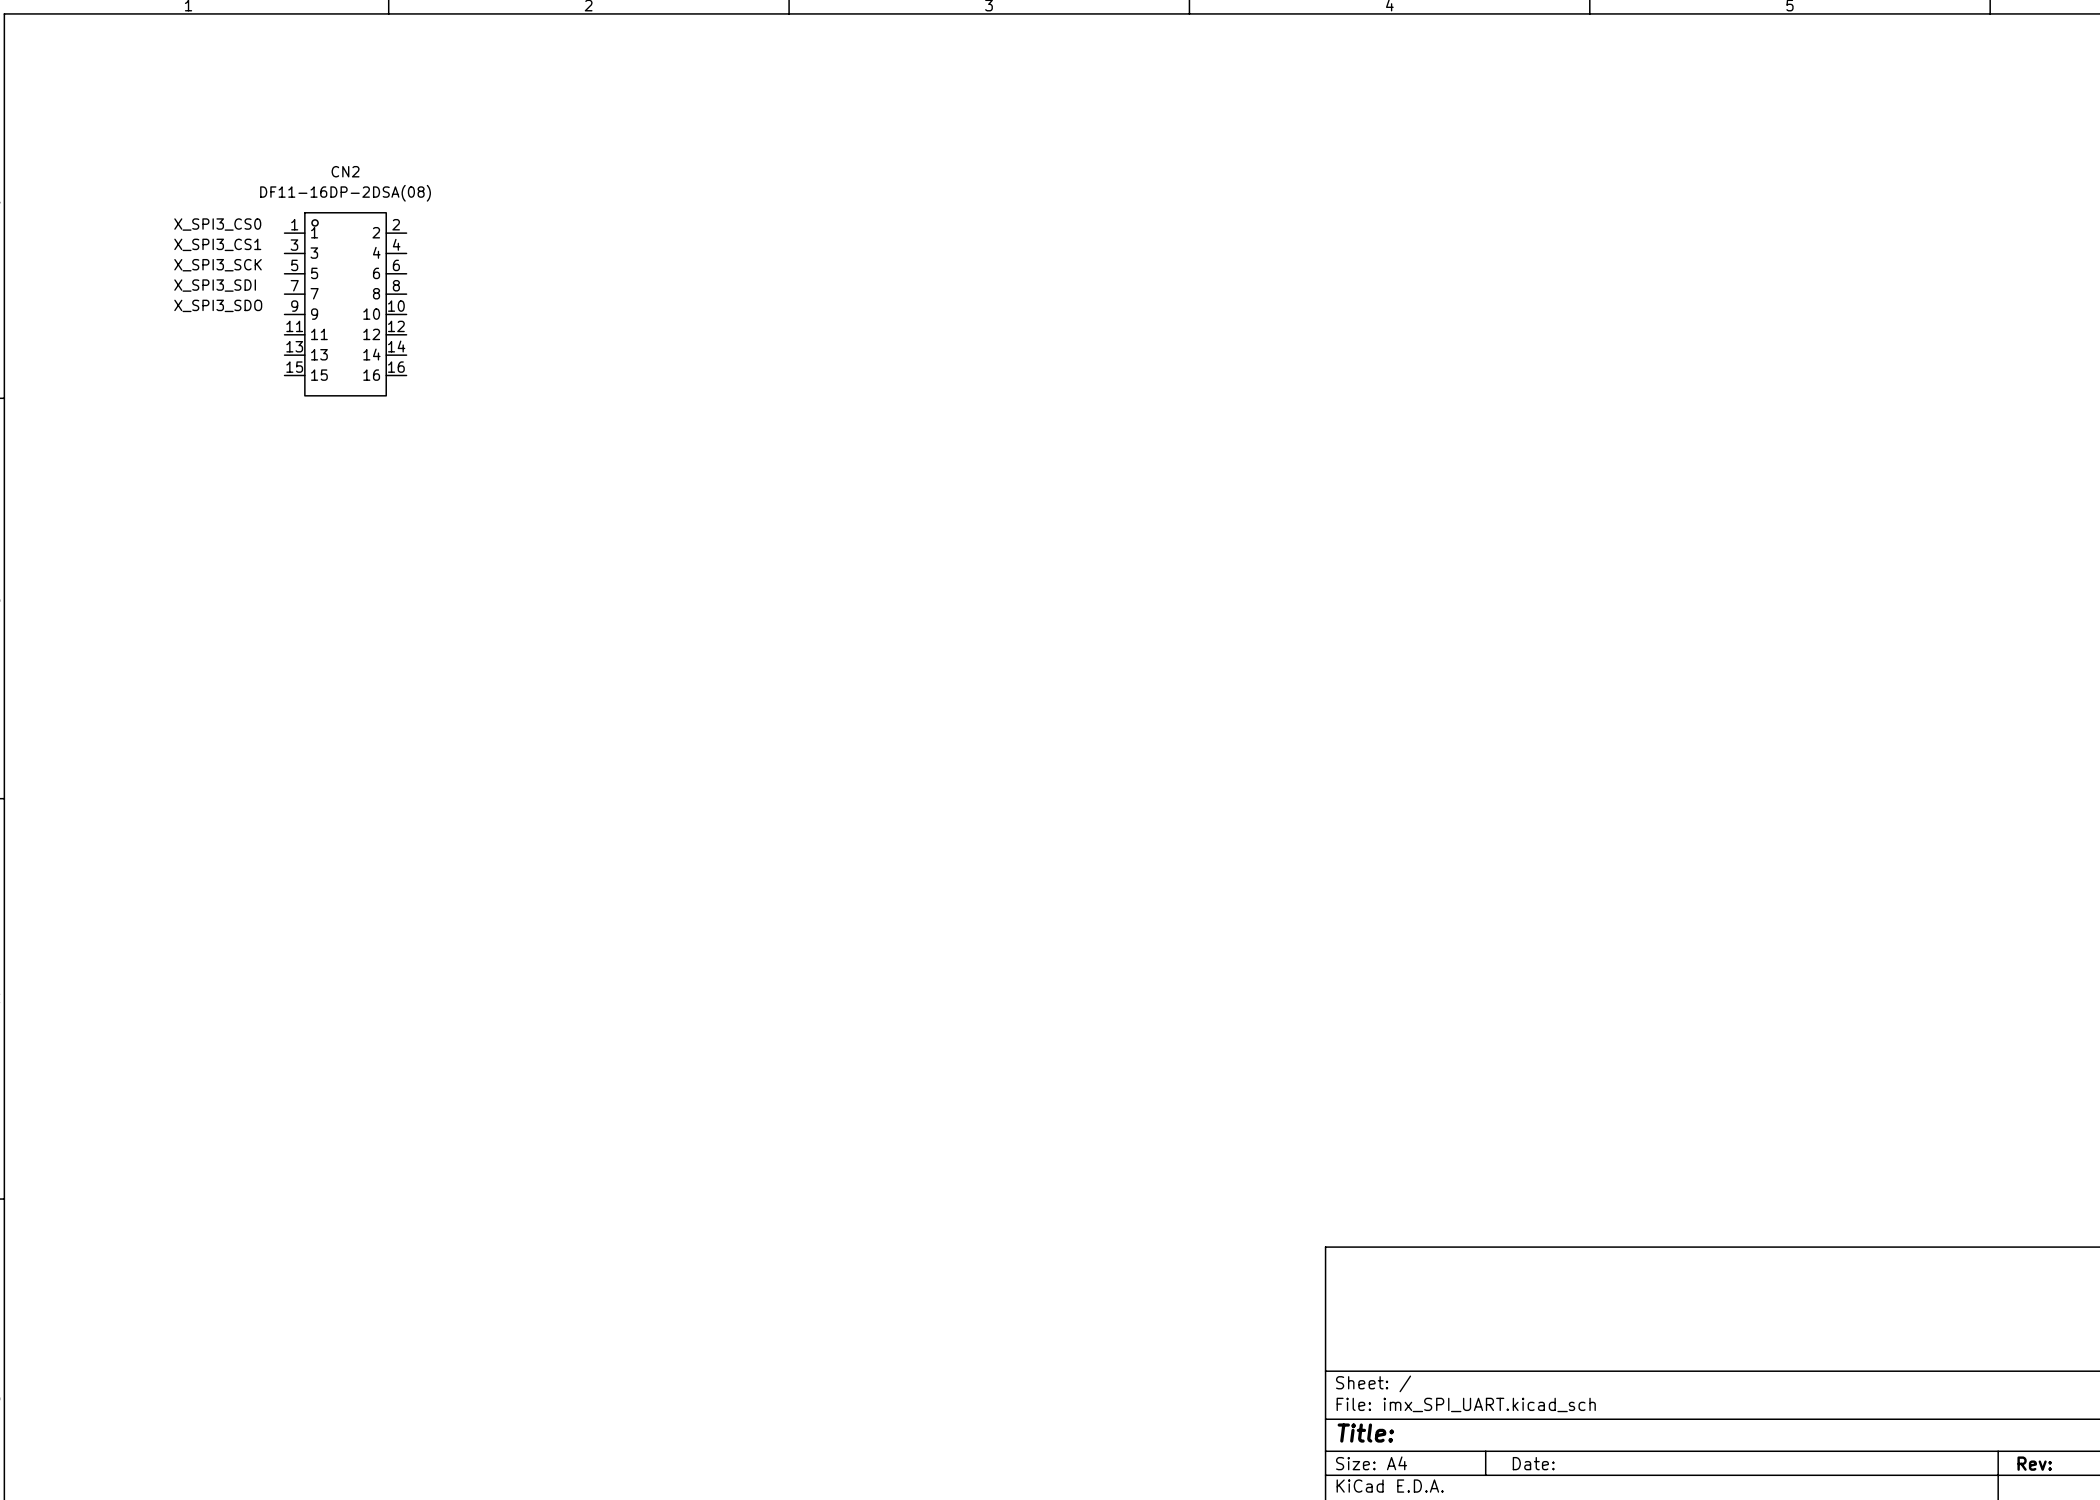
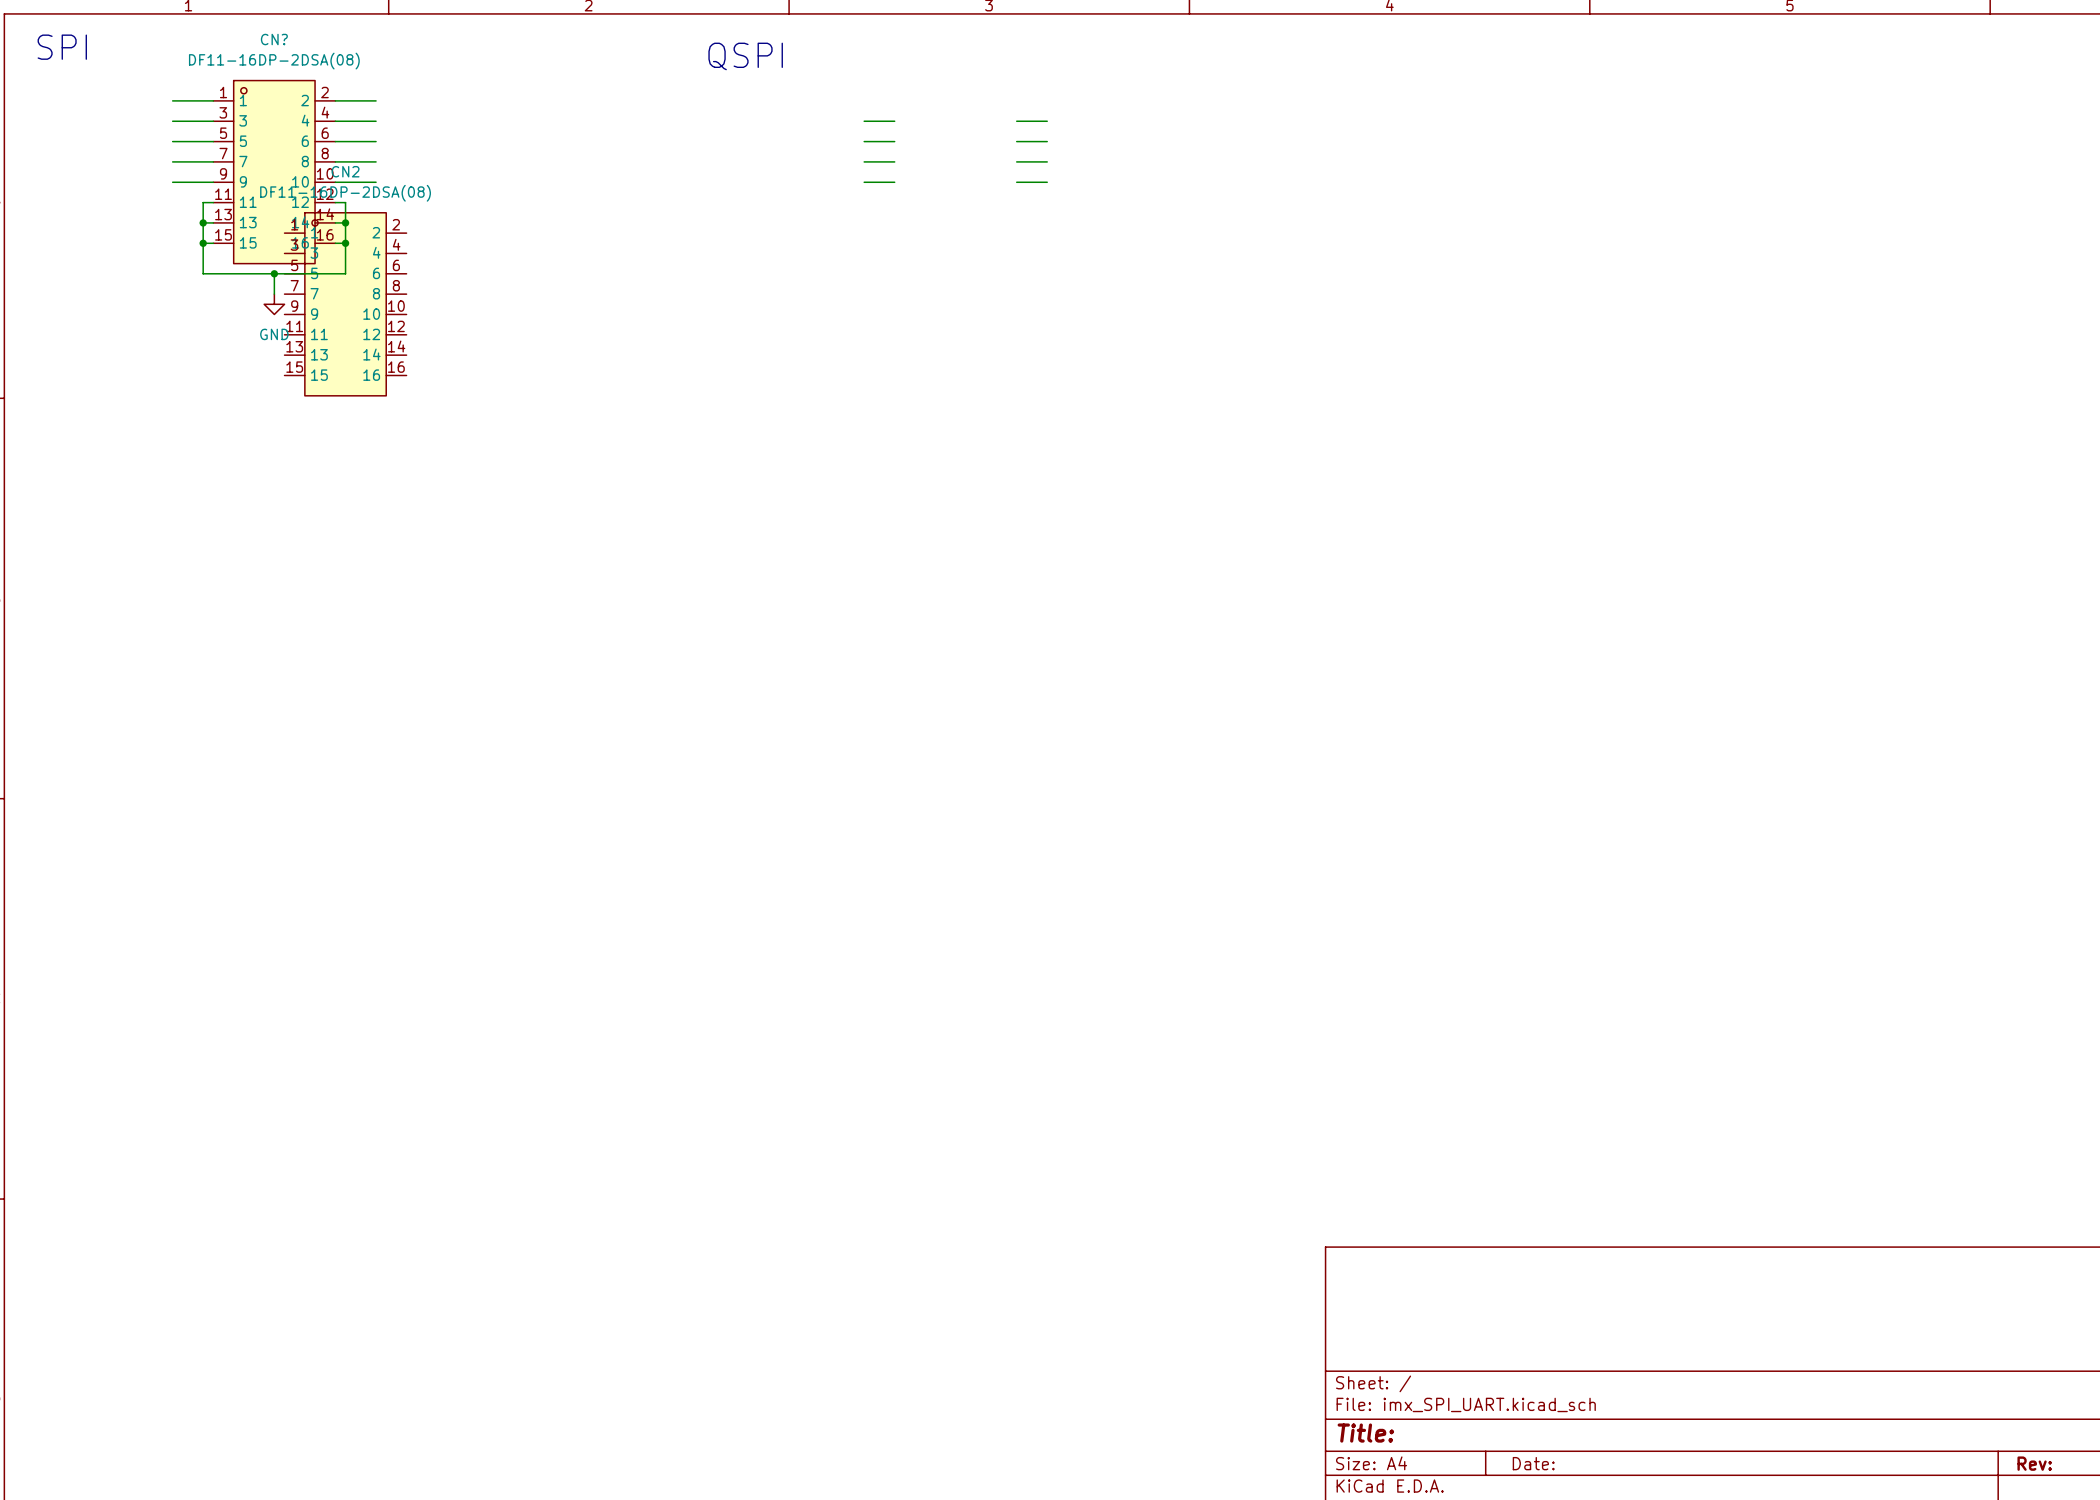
text: none -> SPI (62, 47)
text: none -> QSPI (745, 56)
wire: none -> (172, 100) (213, 100)
wire: none -> (335, 100) (376, 100)
wire: none -> (172, 121) (213, 121)
wire: none -> (335, 121) (376, 121)
wire: none -> (864, 121) (894, 121)
wire: none -> (1016, 121) (1047, 121)
wire: none -> (172, 141) (213, 141)
wire: none -> (335, 141) (376, 141)
wire: none -> (864, 141) (894, 141)
wire: none -> (1016, 141) (1047, 141)
wire: none -> (172, 161) (213, 161)
wire: none -> (335, 161) (376, 161)
wire: none -> (864, 161) (894, 161)
wire: none -> (1016, 161) (1047, 161)
CN?: none -> DF11-16DP-2DSA(08) (274, 172)
wire: none -> (172, 182) (213, 182)
wire: none -> (335, 182) (376, 182)
wire: none -> (864, 182) (894, 182)
wire: none -> (1016, 182) (1047, 182)
wire: none -> (213, 202) (203, 202) (203, 273) (345, 273) (345, 202) (335, 202)
wire: none -> (203, 222) (213, 222)
junction: none -> (203, 222)
junction: none -> (345, 222)
label: X_SPI3_CS0 (217, 224) -> none
wire: none -> (203, 243) (213, 243)
junction: none -> (203, 243)
junction: none -> (345, 243)
label: X_SPI3_CS1 (217, 244) -> none
label: X_SPI3_SCK (218, 265) -> none
wire: none -> (274, 273) (274, 294)
junction: none -> (274, 273)
label: X_SPI3_SDI (215, 285) -> none
power symbol: none -> GND (274, 304)
label: X_SPI3_SDO (218, 305) -> none

